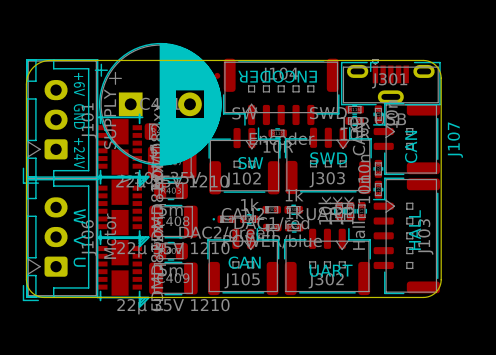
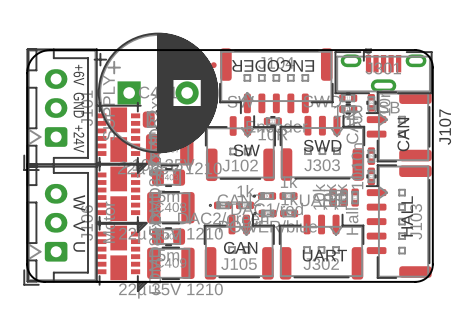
part footprint: [334, 202, 345, 221] -> [329, 188, 337, 207]
part footprint: [345, 202, 356, 221] -> [340, 188, 348, 207]
part footprint: [356, 202, 368, 221] -> [351, 188, 359, 207]
part footprint: [284, 204, 303, 215] -> [279, 192, 298, 200]
part footprint: [239, 214, 259, 225] -> [236, 201, 255, 210]
part footprint: [285, 222, 304, 233] -> [280, 209, 299, 218]

